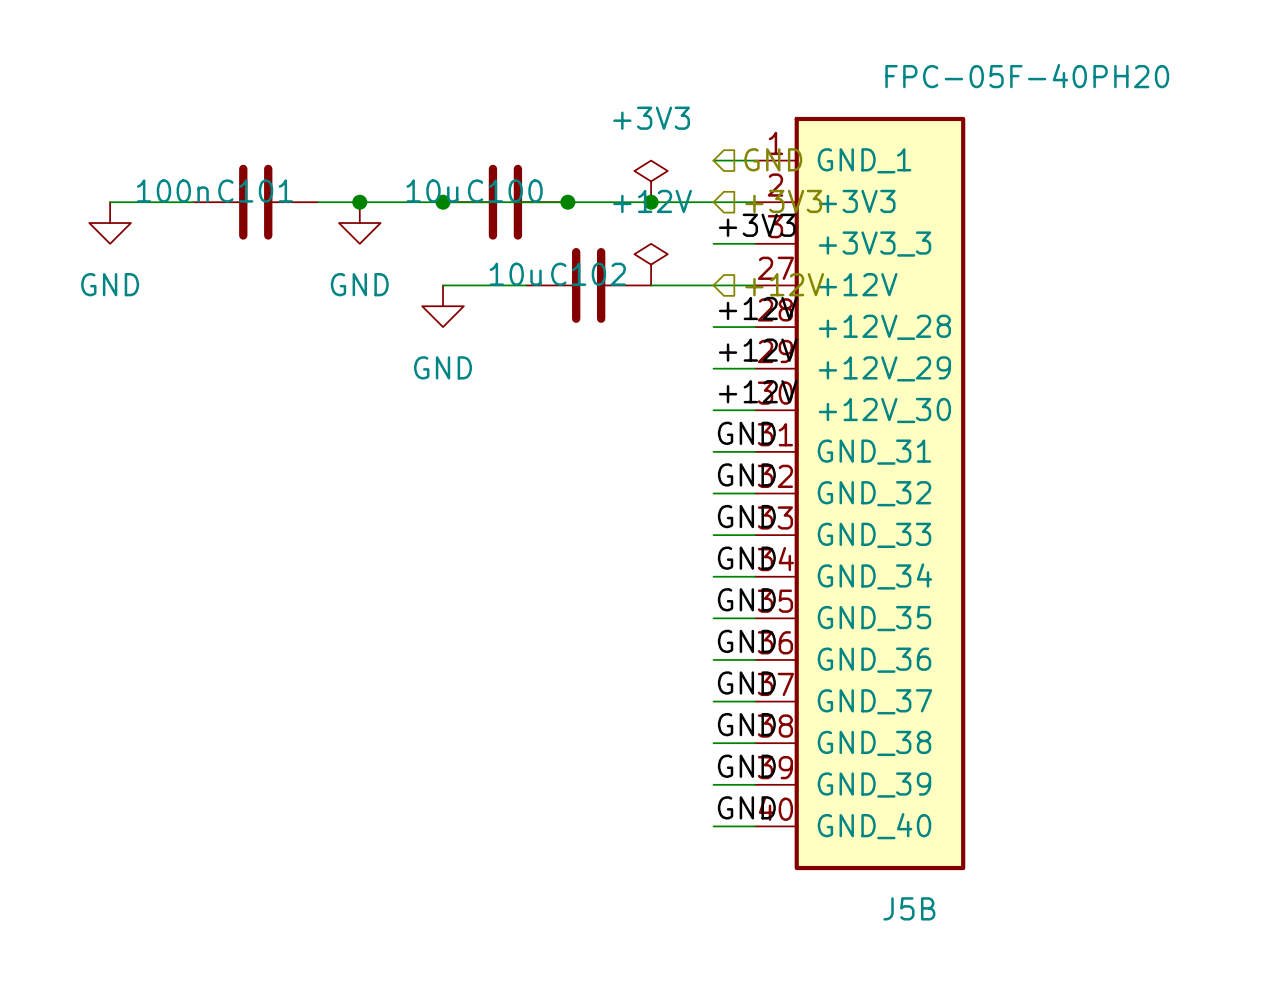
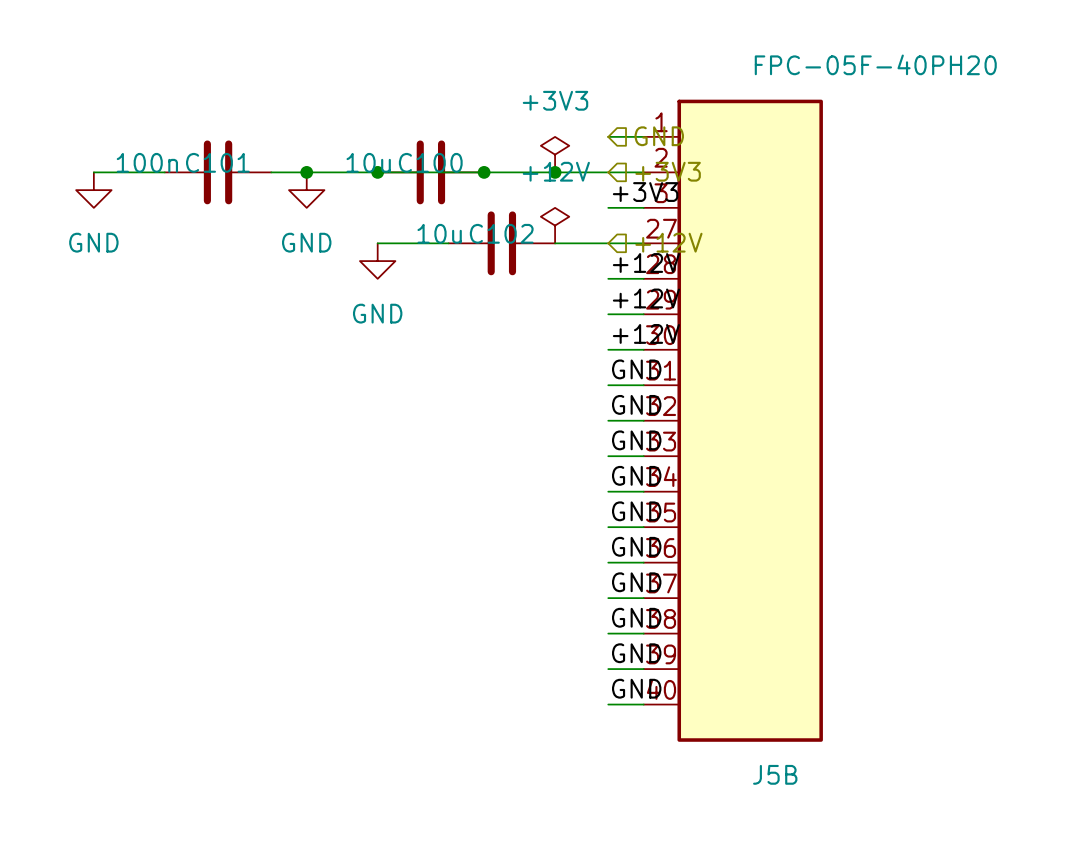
J5B symbol: [755, 116, 966, 871] -> [643, 99, 823, 742]

